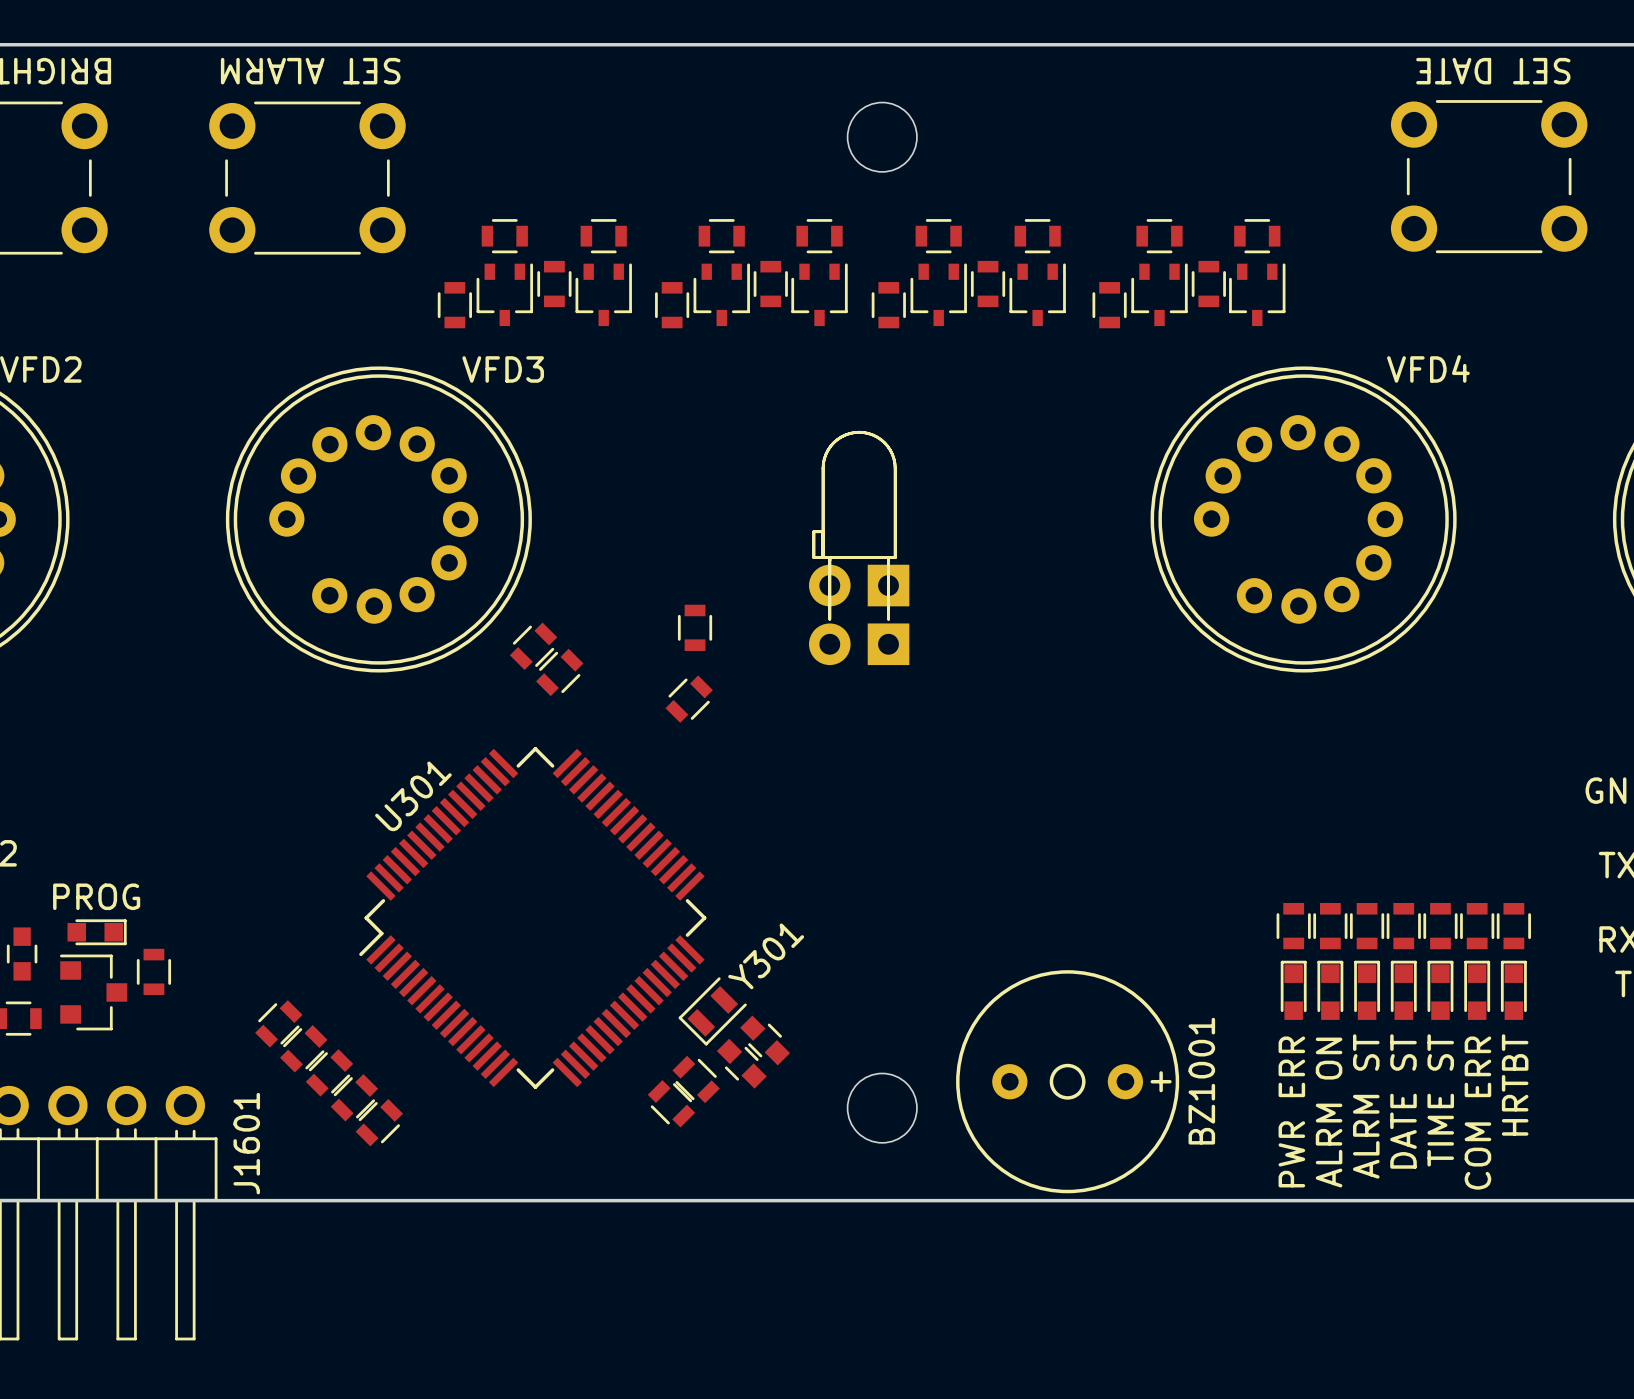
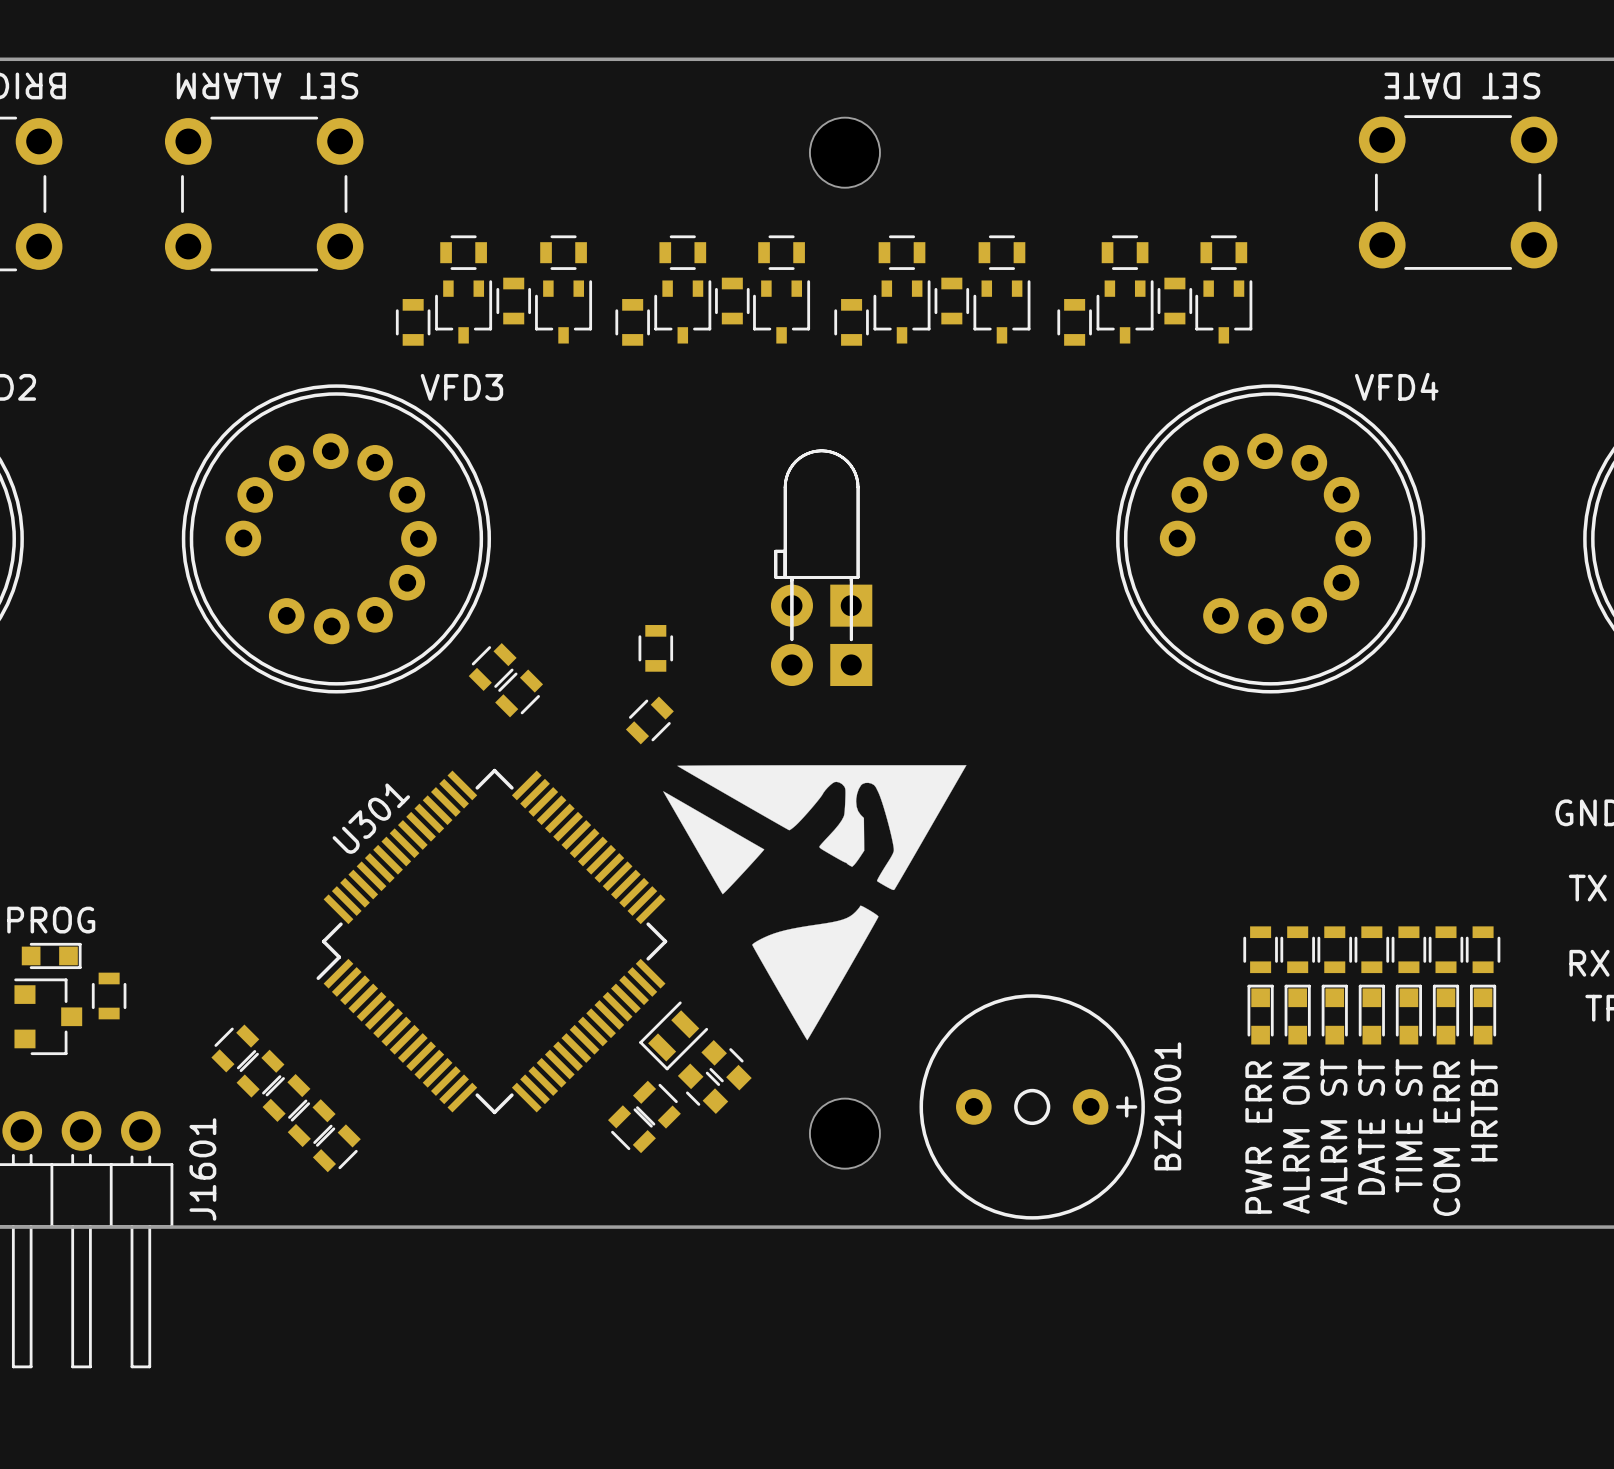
drawing: none -> [663, 765, 967, 1041]
Y301 name: Y301 (766, 956) -> none

